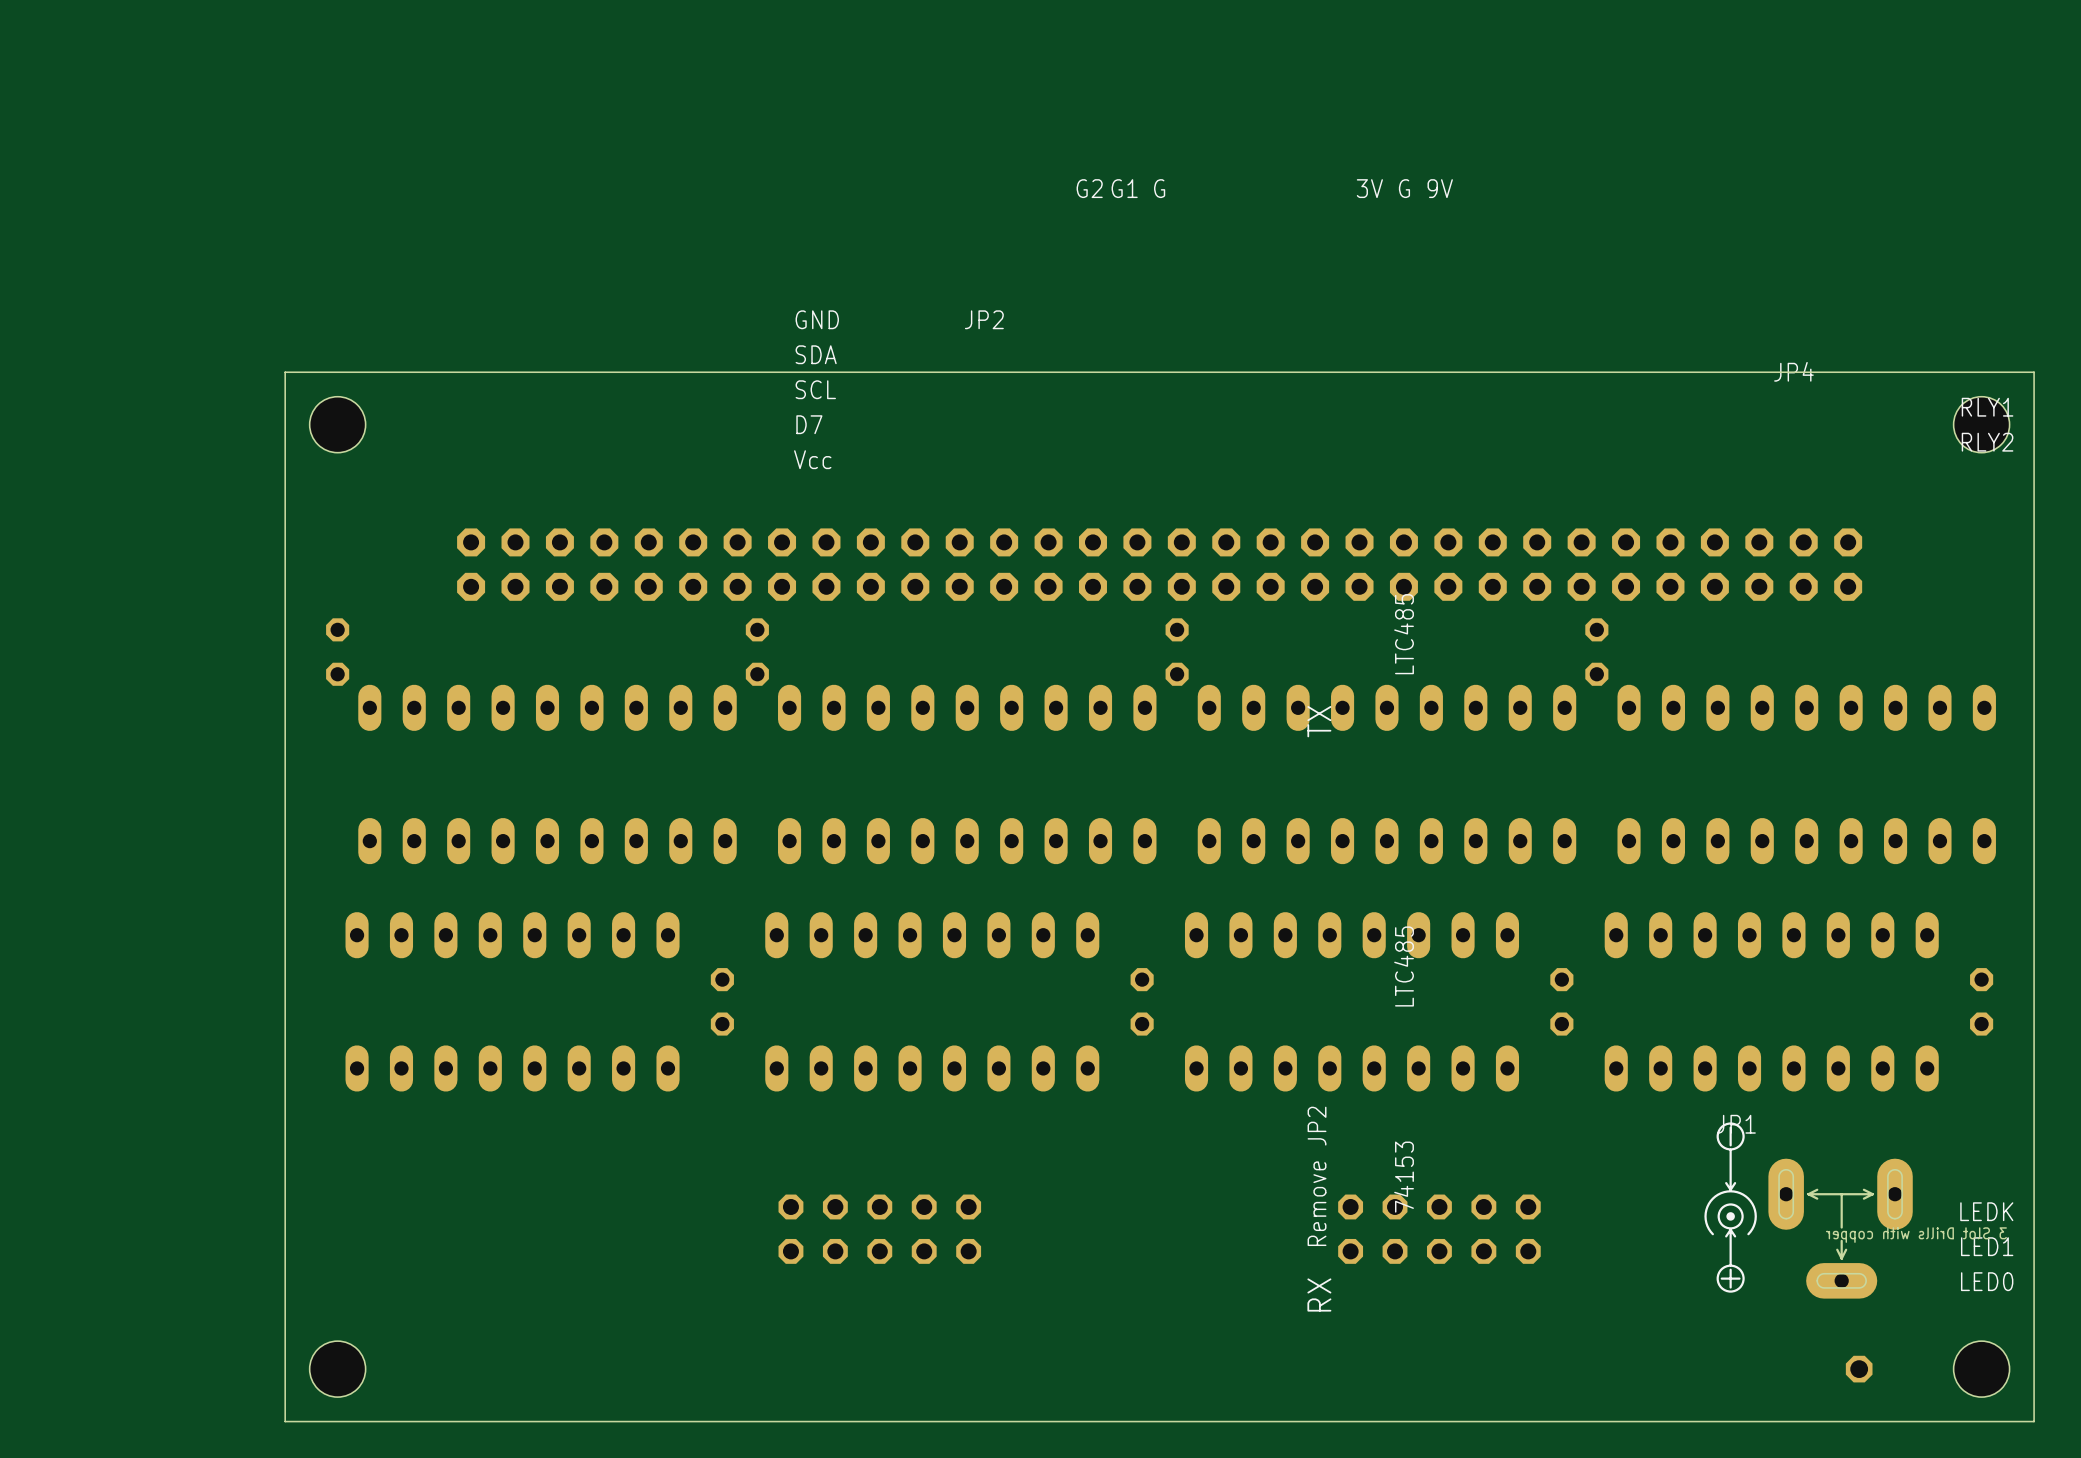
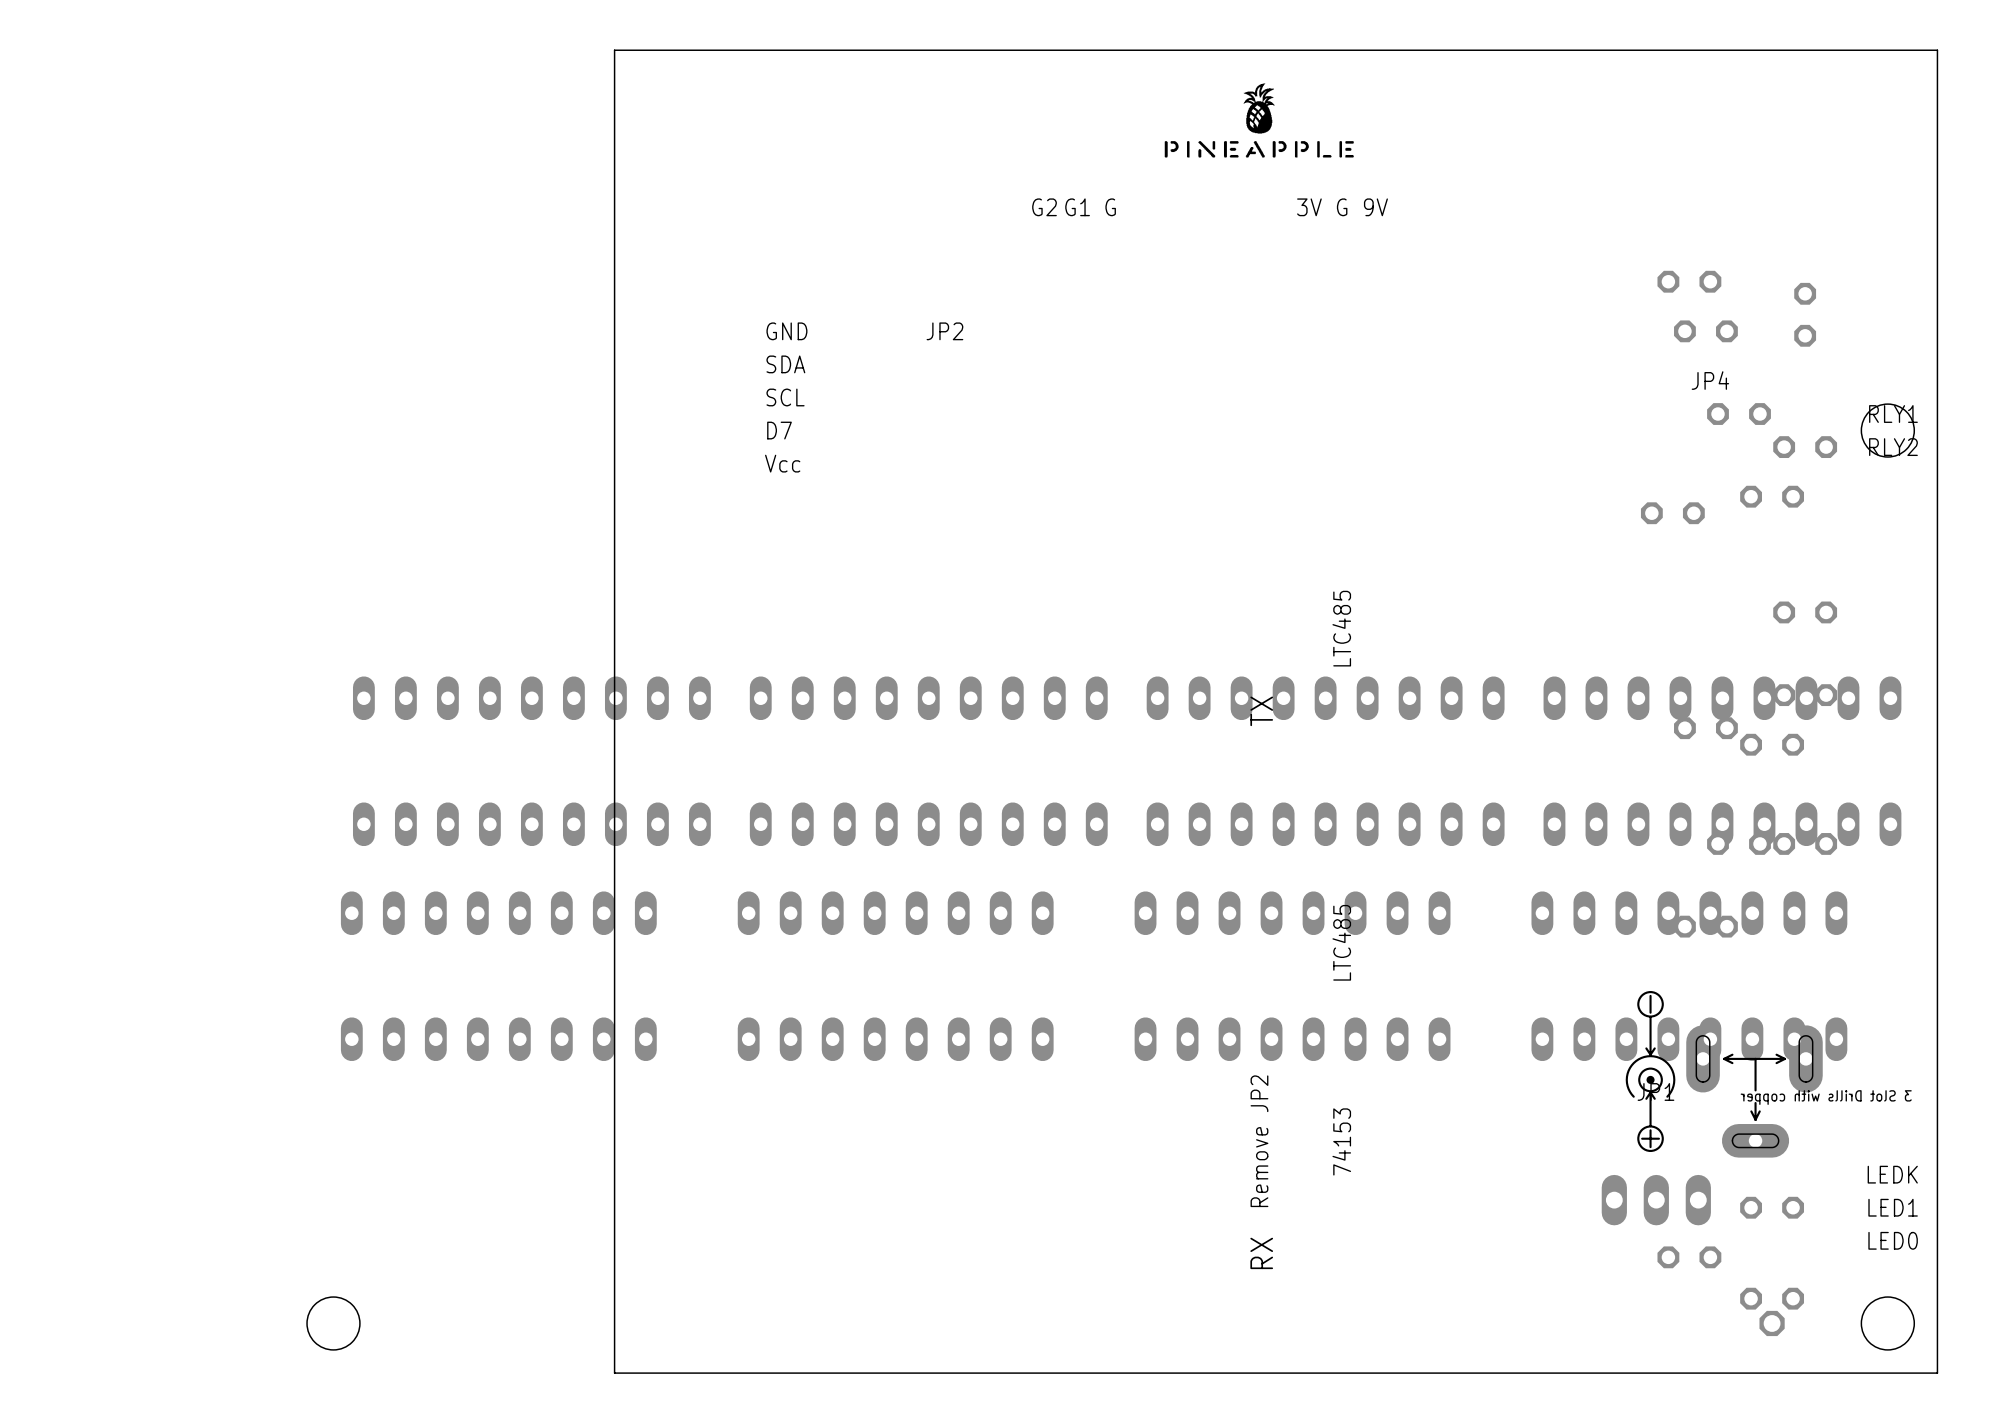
drawing: none -> [1164, 83, 1354, 158]
part: none -> (1689, 281)
part: none -> (1805, 314)
part: none -> (1705, 331)
board edge: (2034, 372) (285, 372) (285, 1421) (634, 1421) -> (1937, 380) (1937, 50) (614, 50) (614, 1373)
part: none -> (1739, 414)
hole: (337, 424) -> none
part: none -> (1805, 447)
part: none -> (1772, 496)
part: none -> (1672, 513)
part: (1159, 564) -> none
part: none -> (1805, 612)
part: (337, 652) -> none
part: (757, 652) -> none
part: (1177, 652) -> none
part: (1596, 652) -> none
part: none -> (1805, 695)
part: none -> (1705, 728)
part: none -> (1772, 744)
part: none -> (1739, 843)
part: none -> (1805, 843)
part: none -> (1705, 926)
part: (722, 1001) -> none
part: (1142, 1001) -> none
part: (1561, 1001) -> none
part: (1981, 1001) -> none
part position: (1808, 1210) -> (1724, 1074)
part: (879, 1229) -> none
part: (1439, 1229) -> none
part: none -> (1656, 1200)
part: none -> (1772, 1207)
part: none -> (1689, 1257)
part: none -> (1772, 1298)

